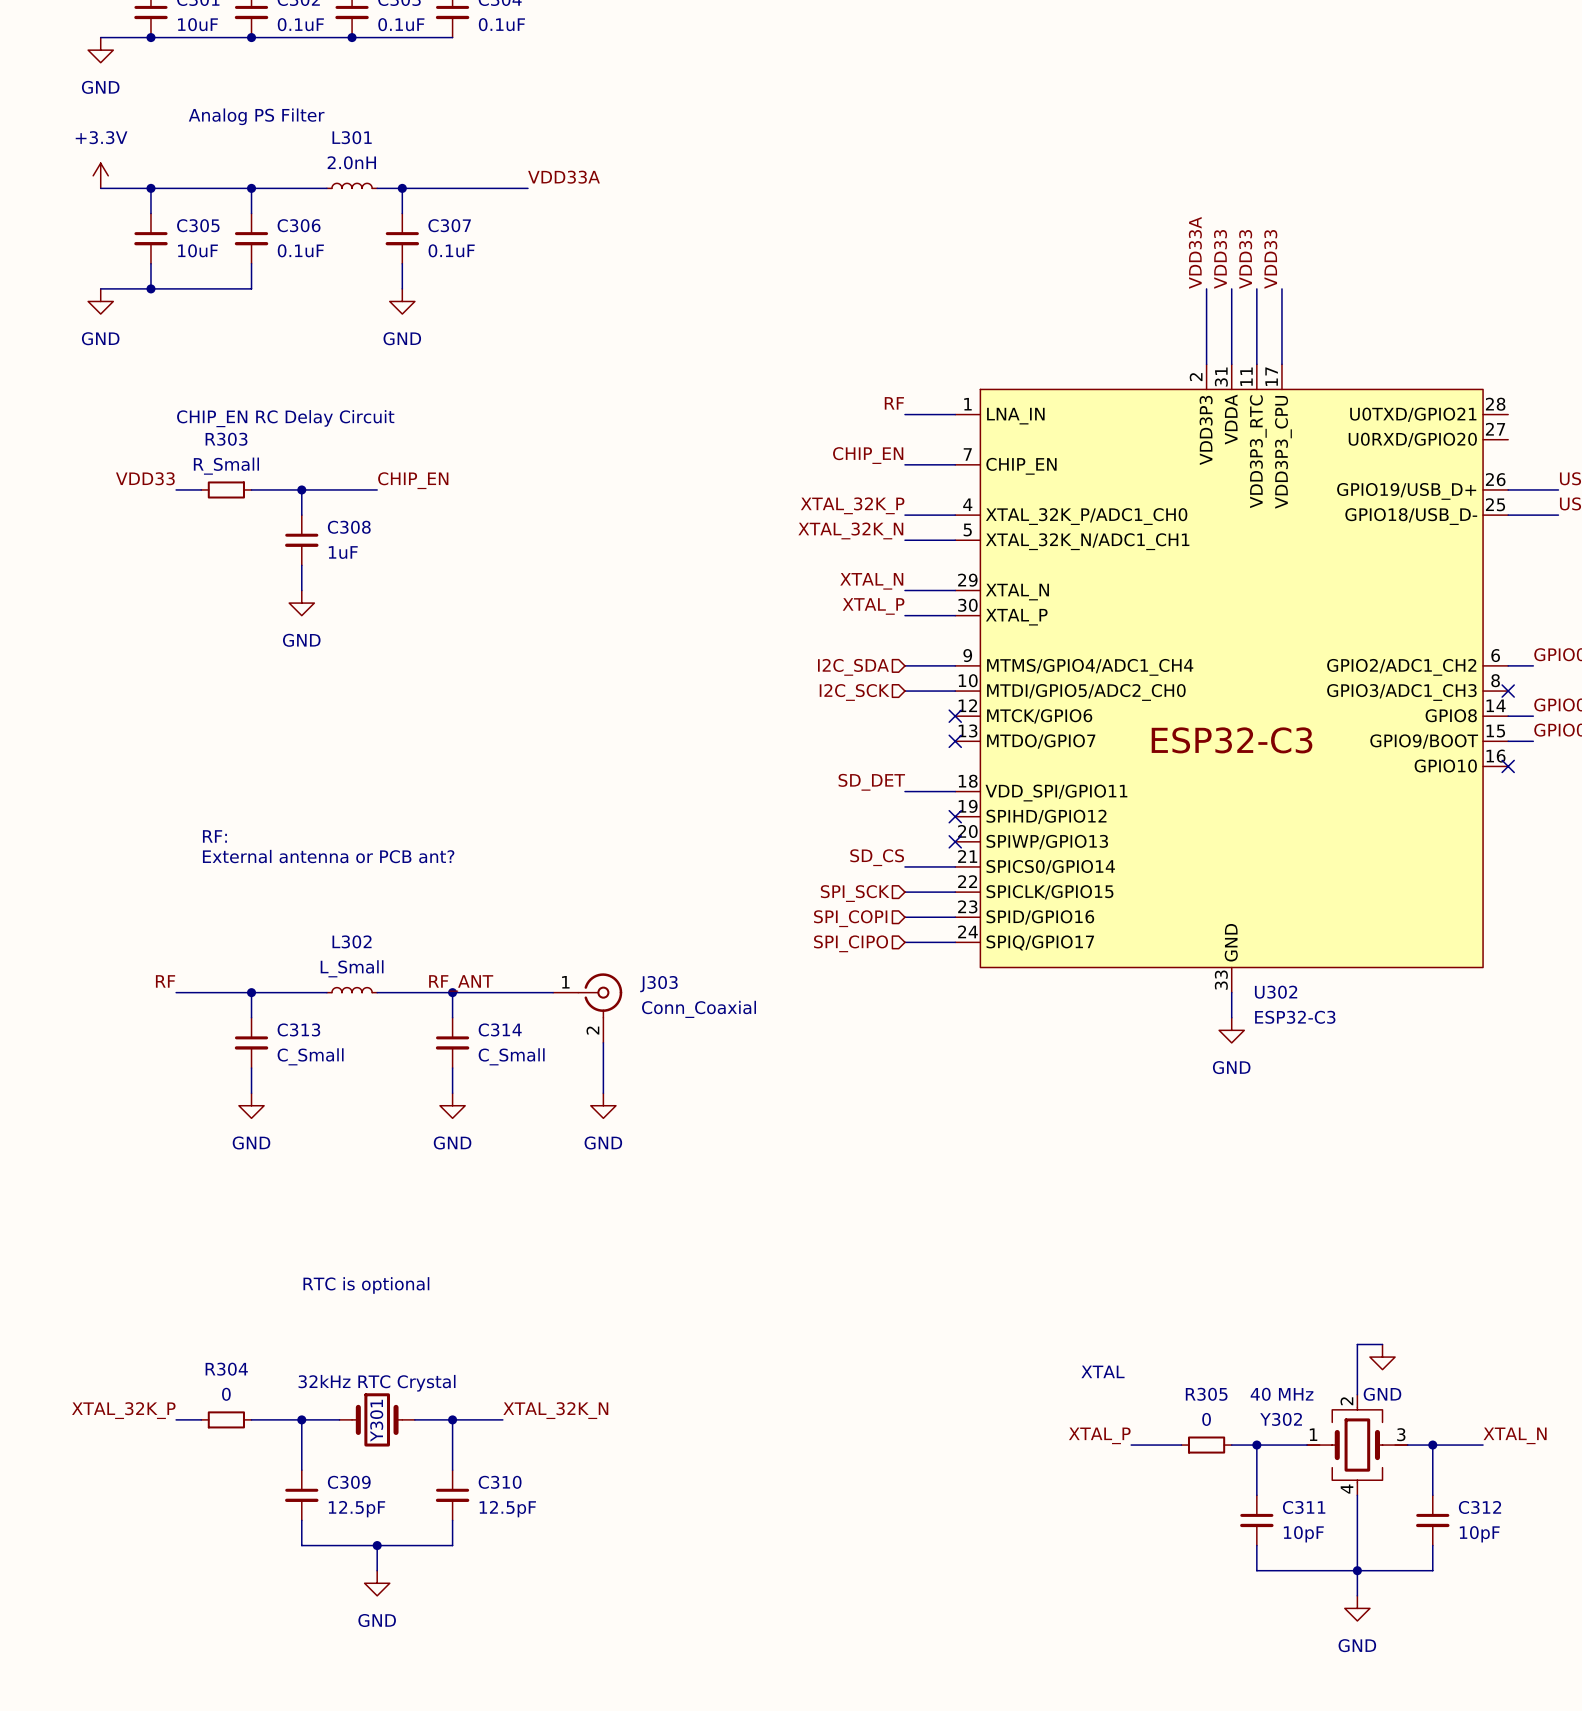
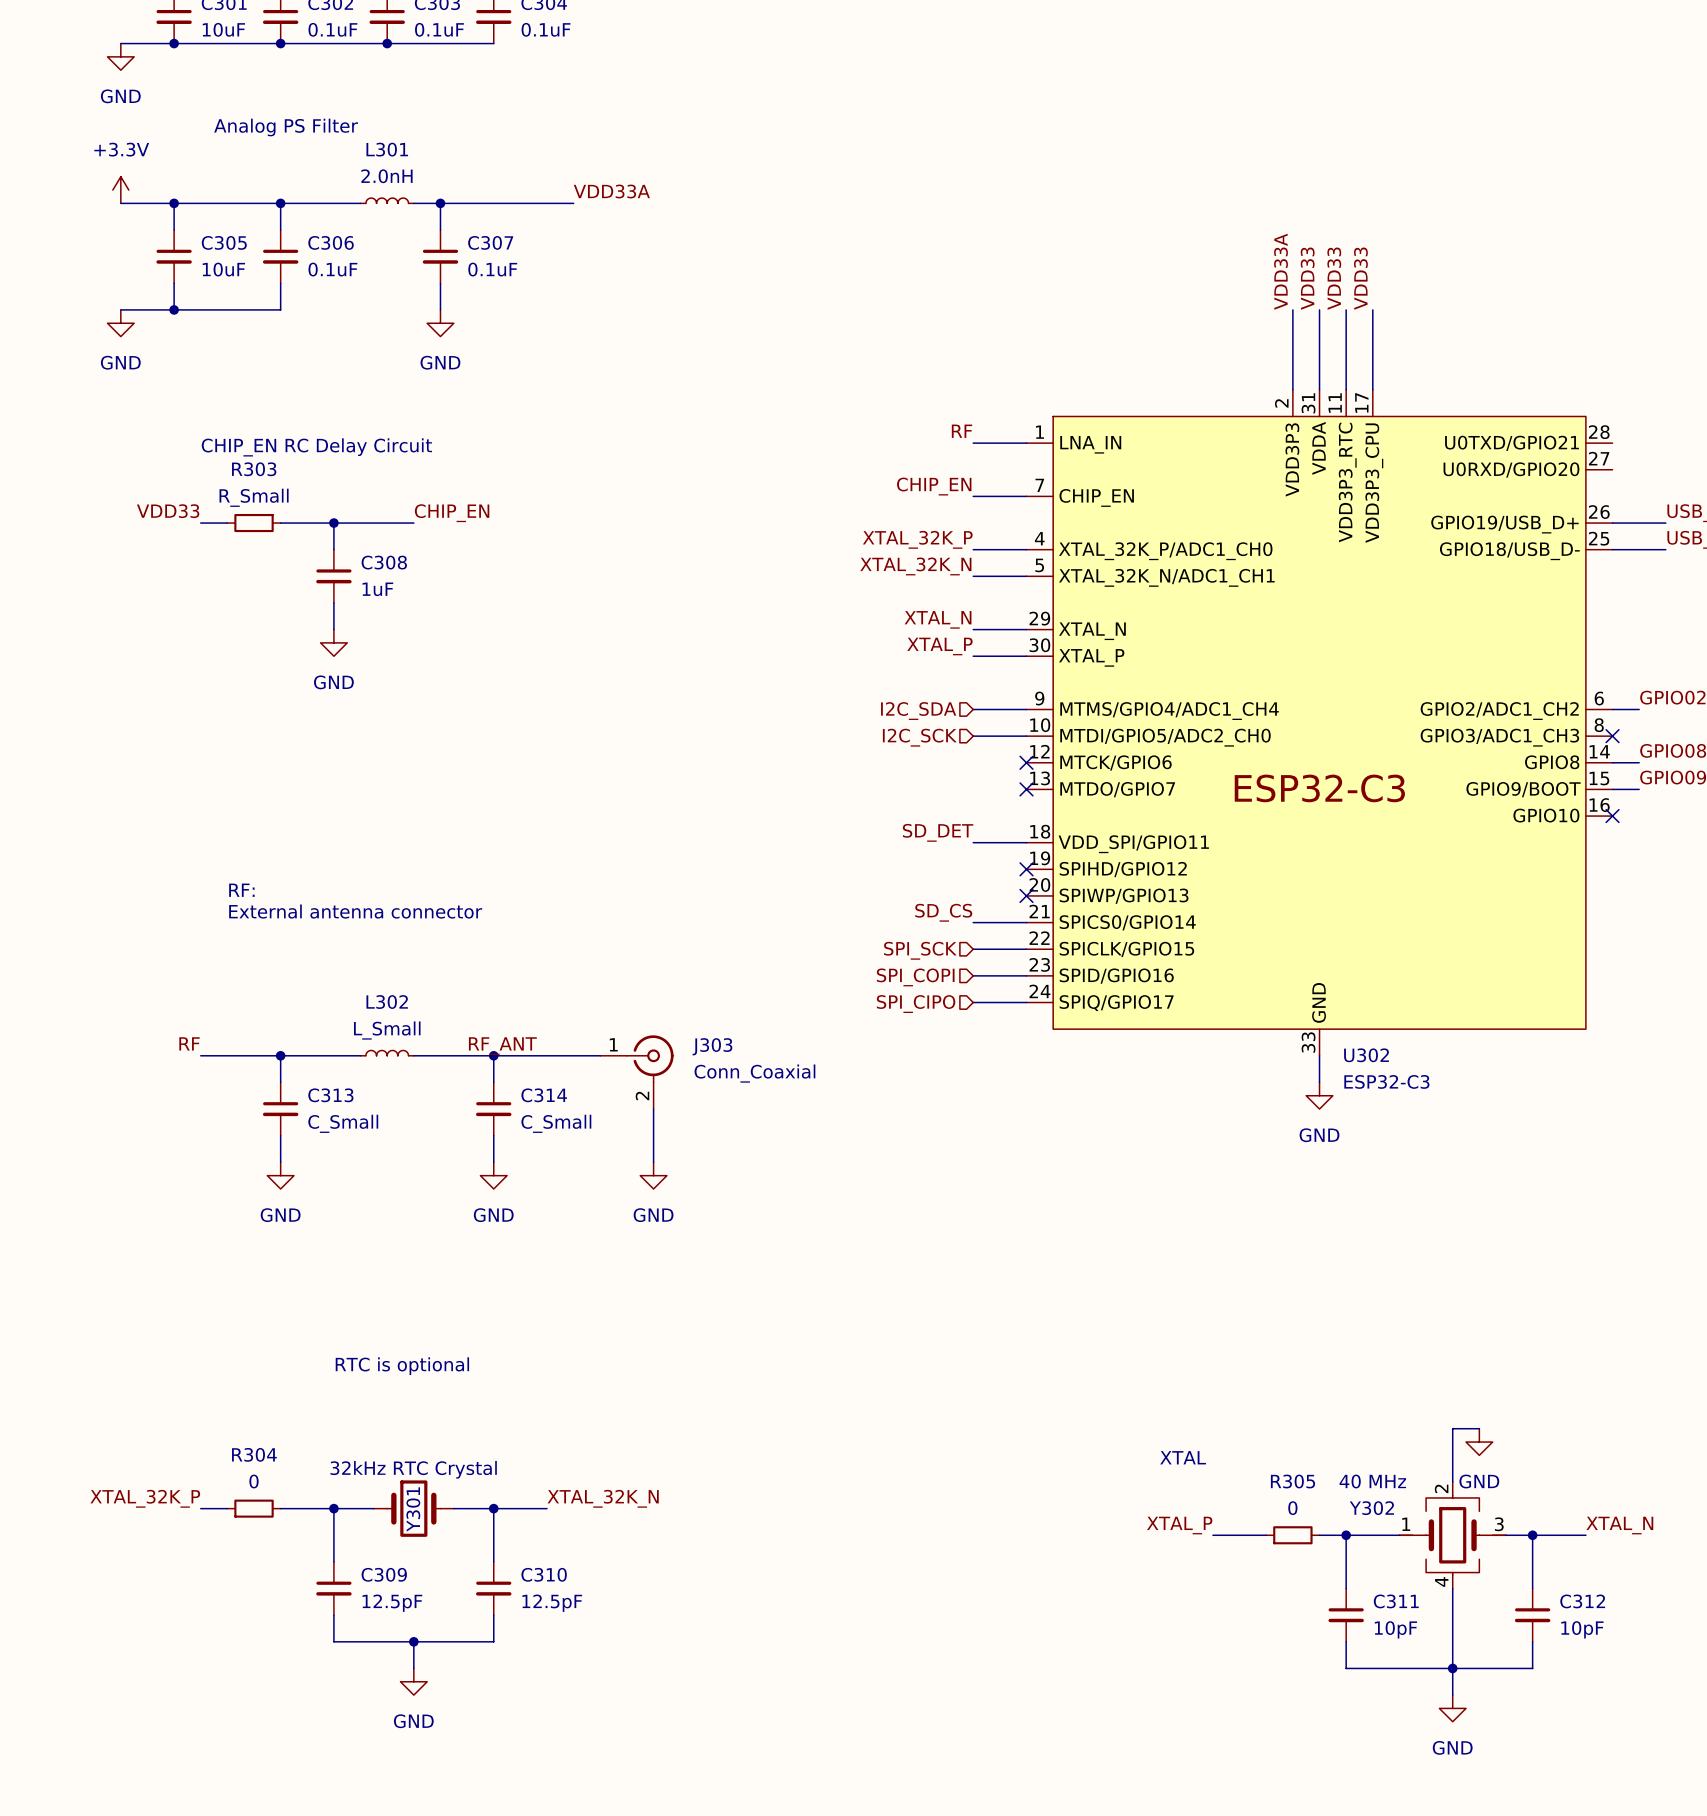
text: External antenna or PCB ant? (328, 856) -> External antenna connector (355, 911)

